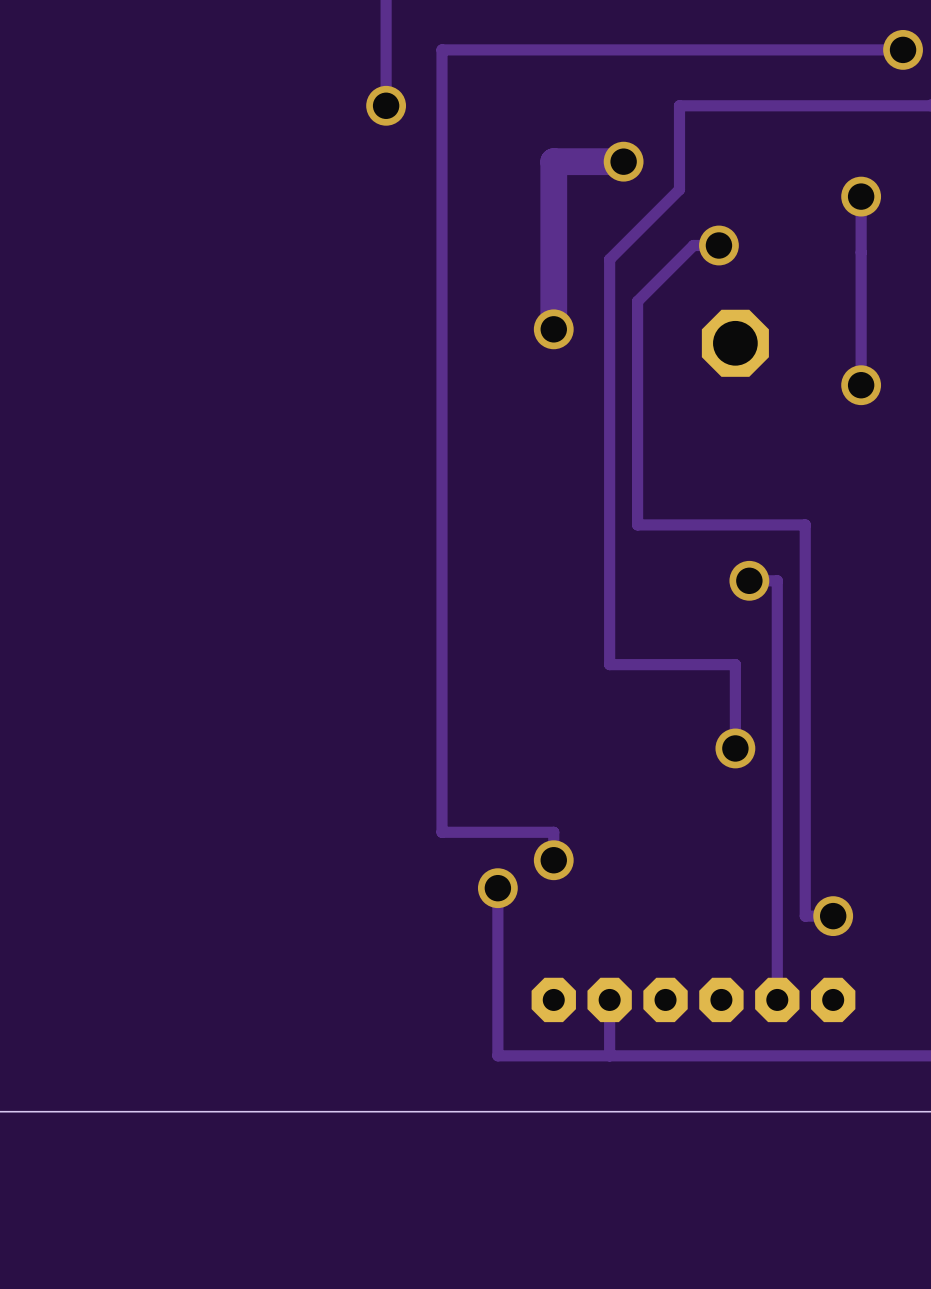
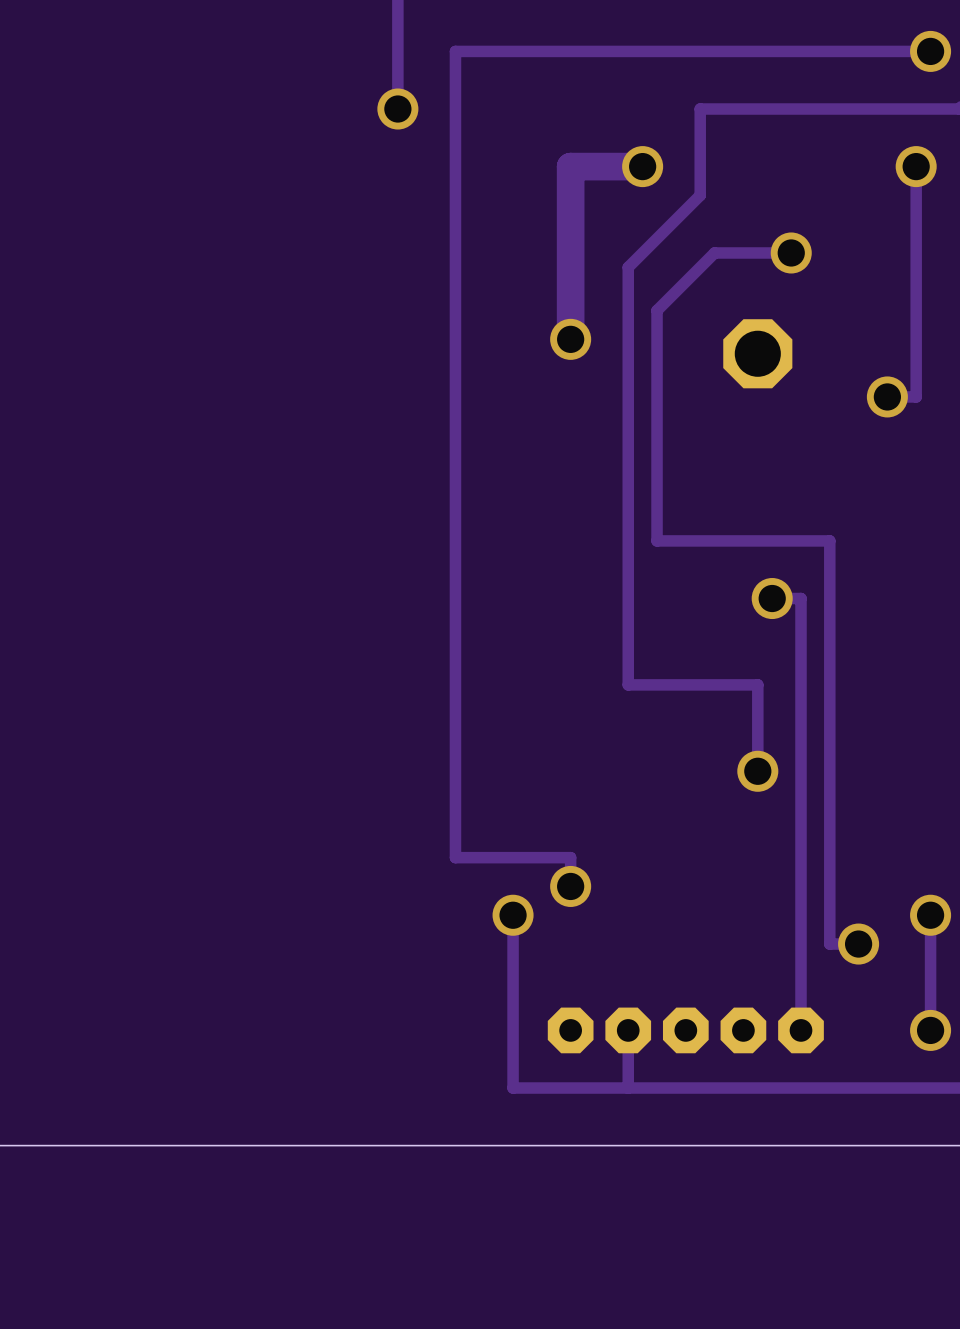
track: (861, 196) (861, 385) -> (916, 166) (916, 396) (887, 396)
via position: (861, 196) -> (916, 166)
via position: (718, 245) -> (791, 252)
track: none -> (791, 252) (740, 252)
track: none -> (930, 915) (930, 1030)
via: none -> (930, 915)
part footprint: [531, 977, 856, 1023] -> [547, 1007, 824, 1054]
via: none -> (930, 1030)

